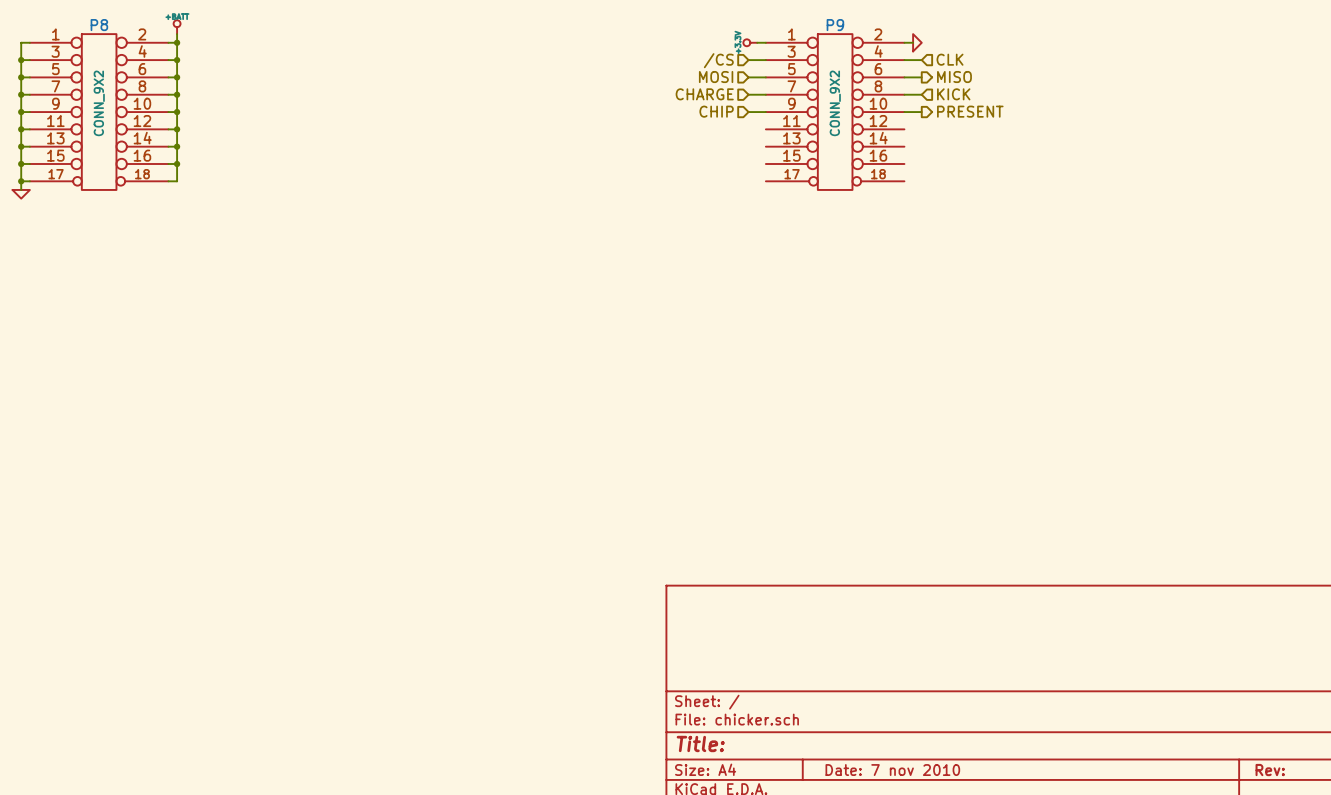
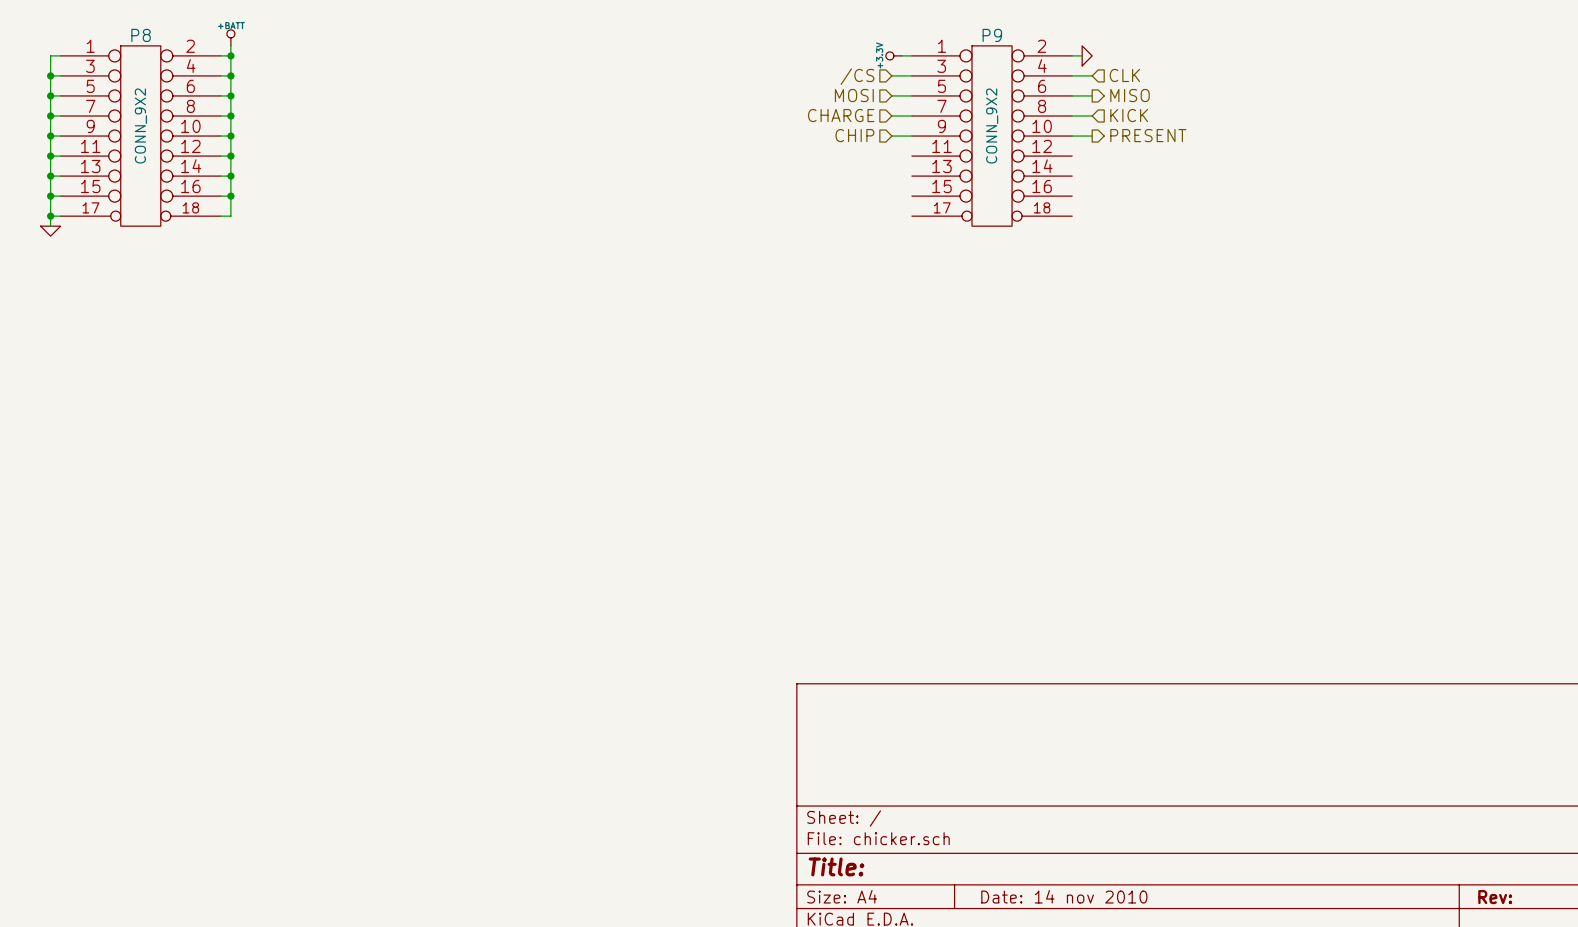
title block: Date: 7 nov 2010 (892, 770) -> Date: 14 nov 2010 (1064, 896)

